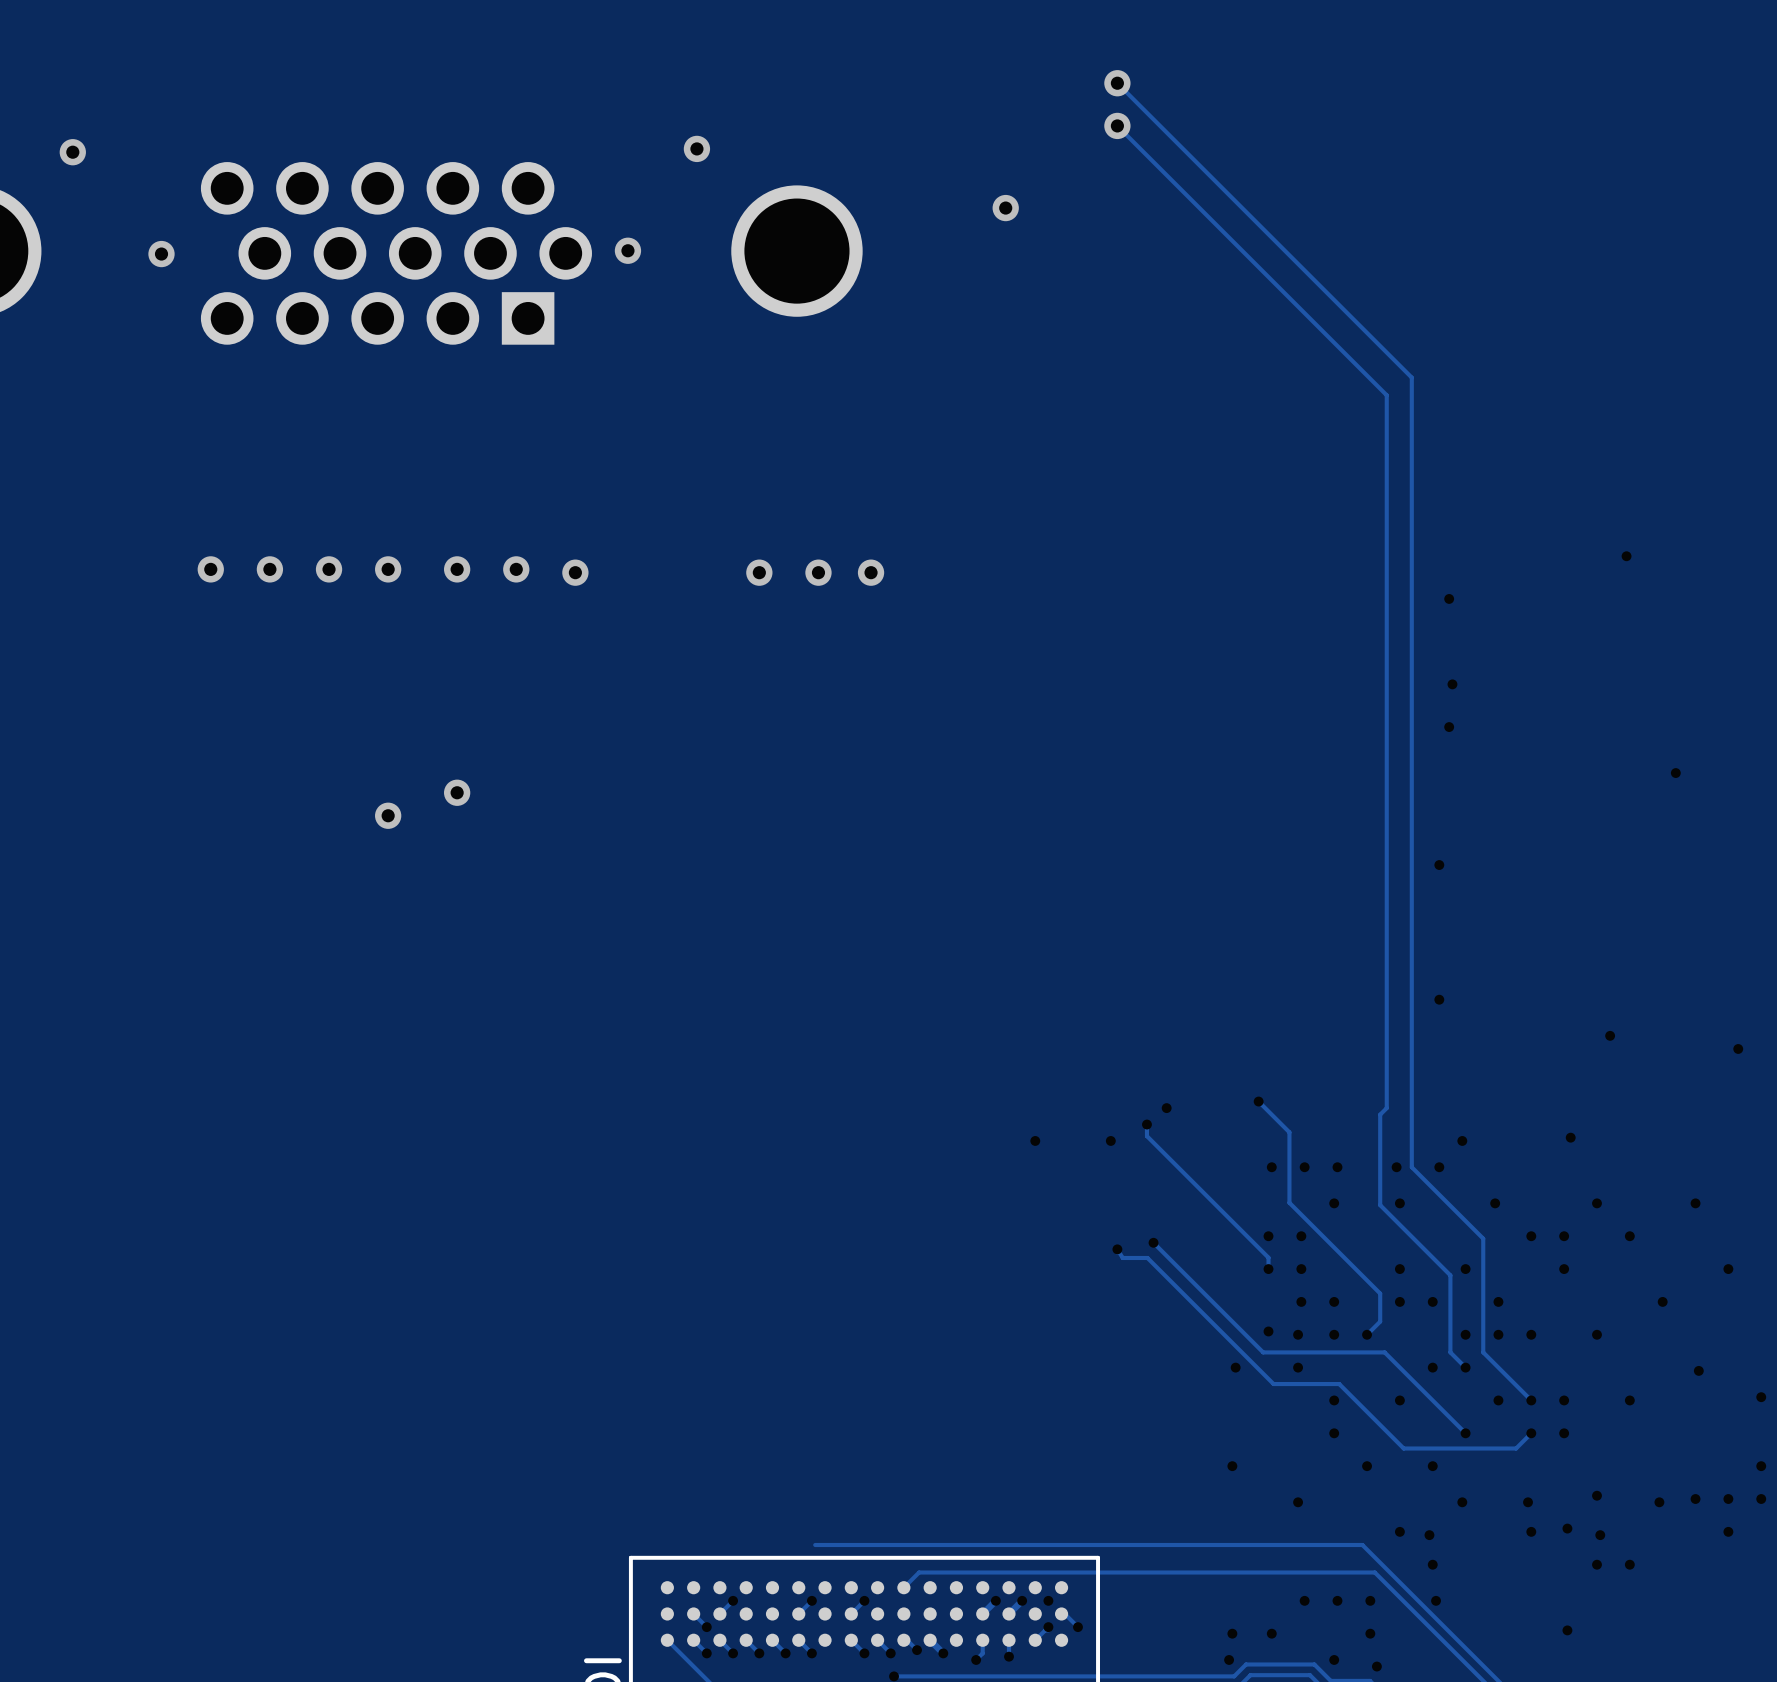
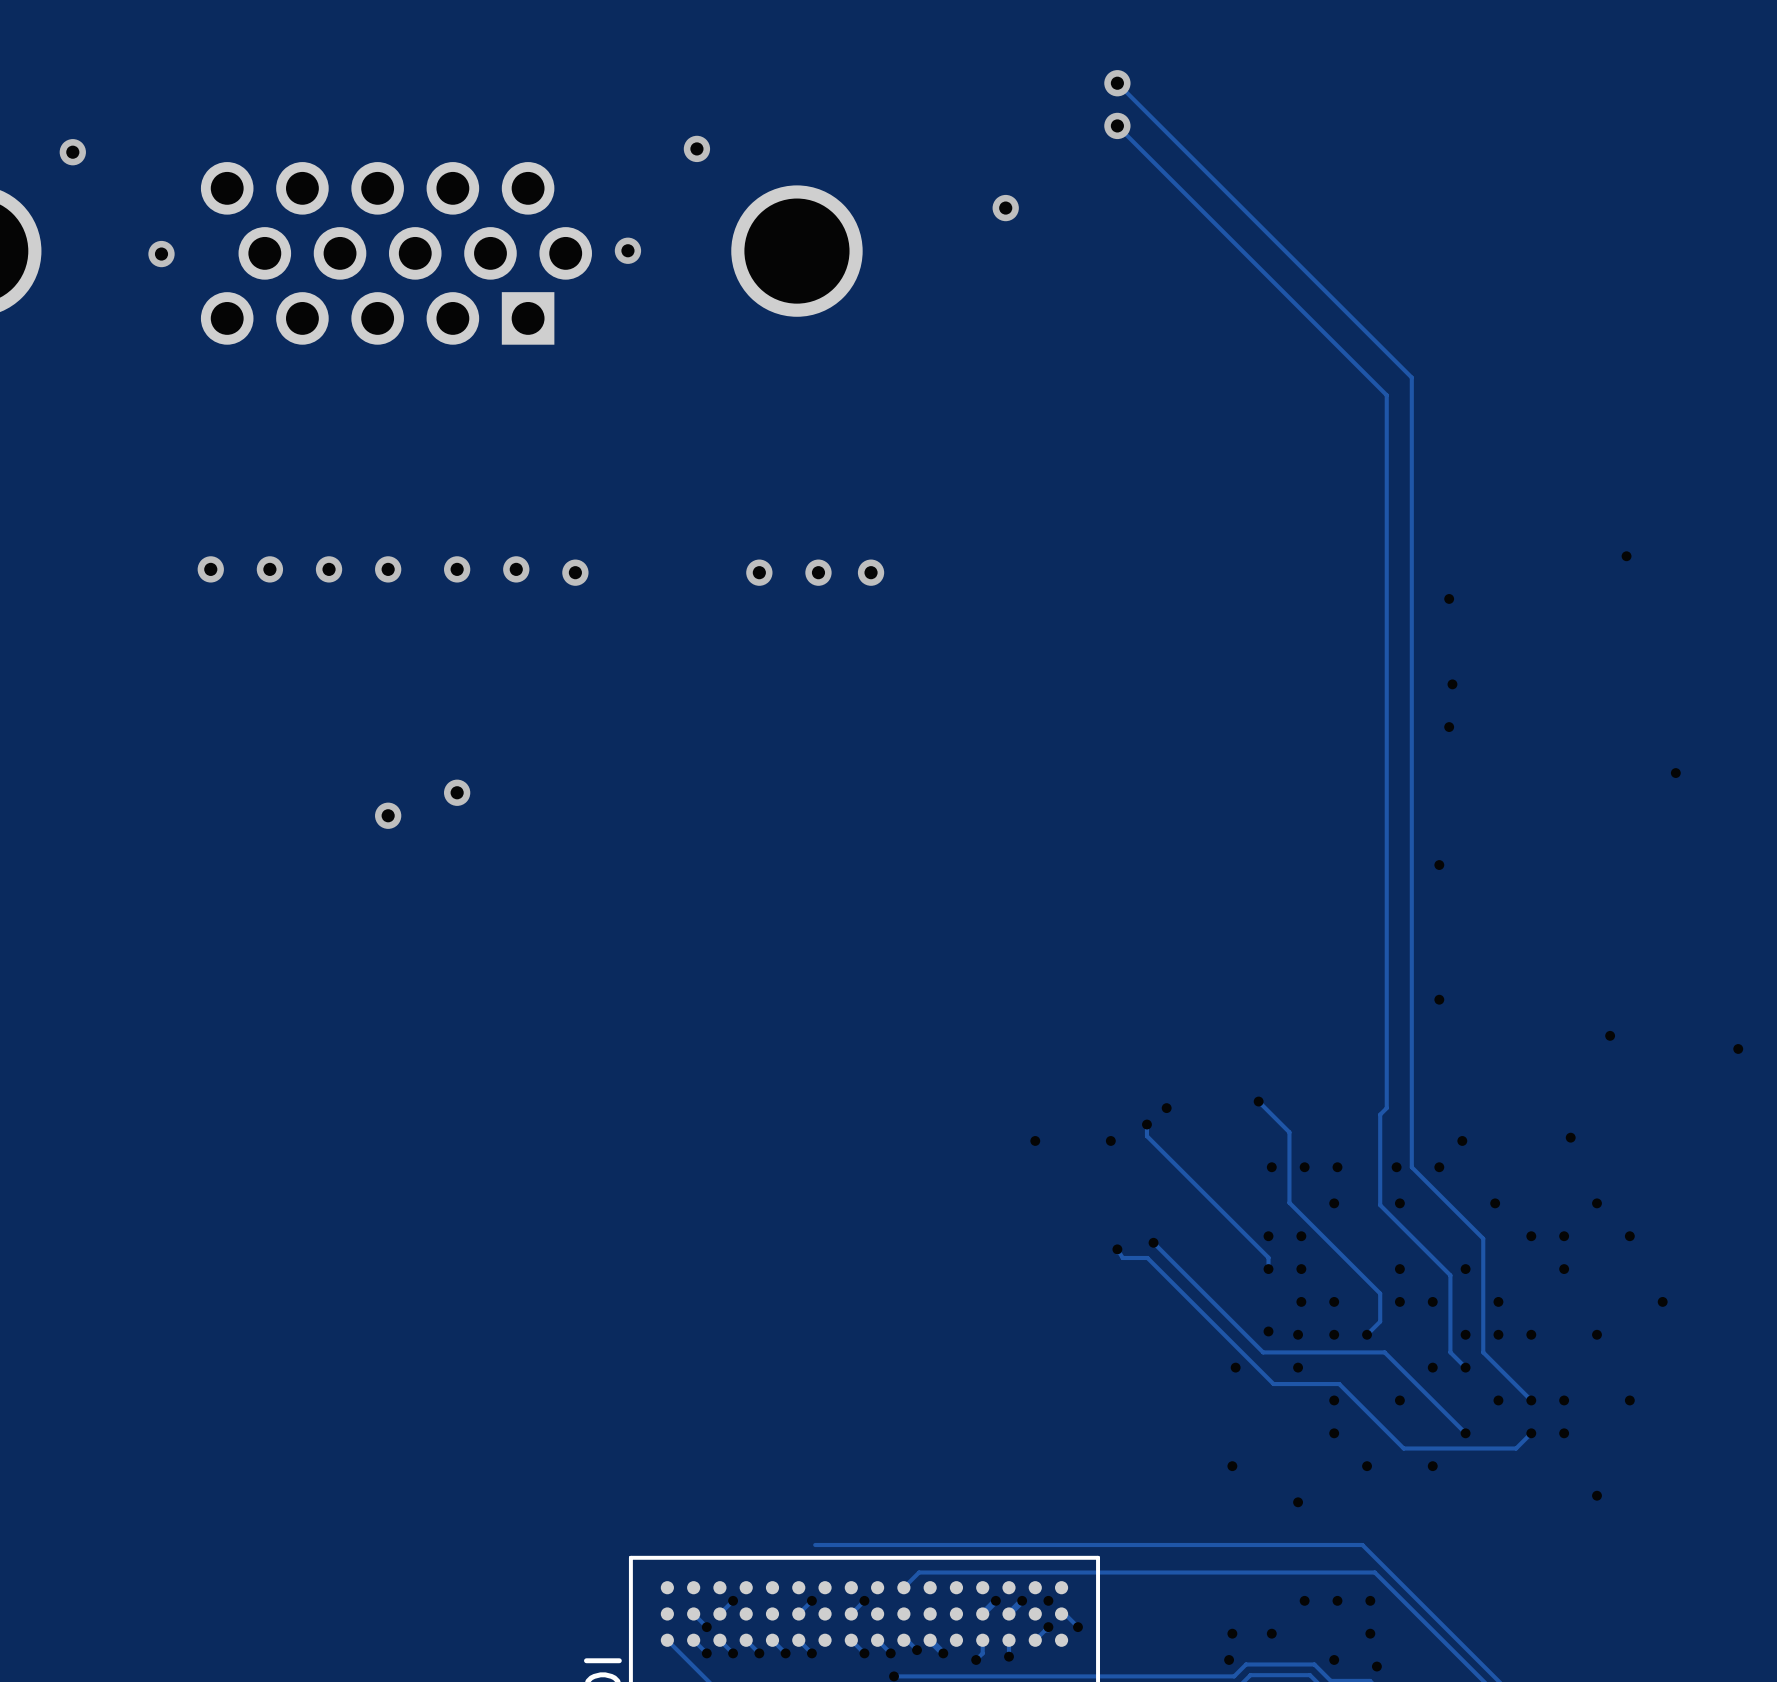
via: (1695, 1203) -> none
via: (1728, 1269) -> none
via: (1698, 1370) -> none
via: (1761, 1397) -> none
via: (1761, 1466) -> none
via: (1695, 1499) -> none
via: (1728, 1499) -> none
via: (1761, 1499) -> none
via: (1462, 1502) -> none
via: (1528, 1502) -> none
via: (1659, 1502) -> none
via: (1567, 1528) -> none
via: (1399, 1531) -> none
via: (1531, 1531) -> none
via: (1728, 1531) -> none
via: (1429, 1535) -> none
via: (1600, 1535) -> none
via: (1432, 1564) -> none
via: (1596, 1564) -> none
via: (1629, 1564) -> none
via: (1436, 1600) -> none
via: (1567, 1630) -> none

